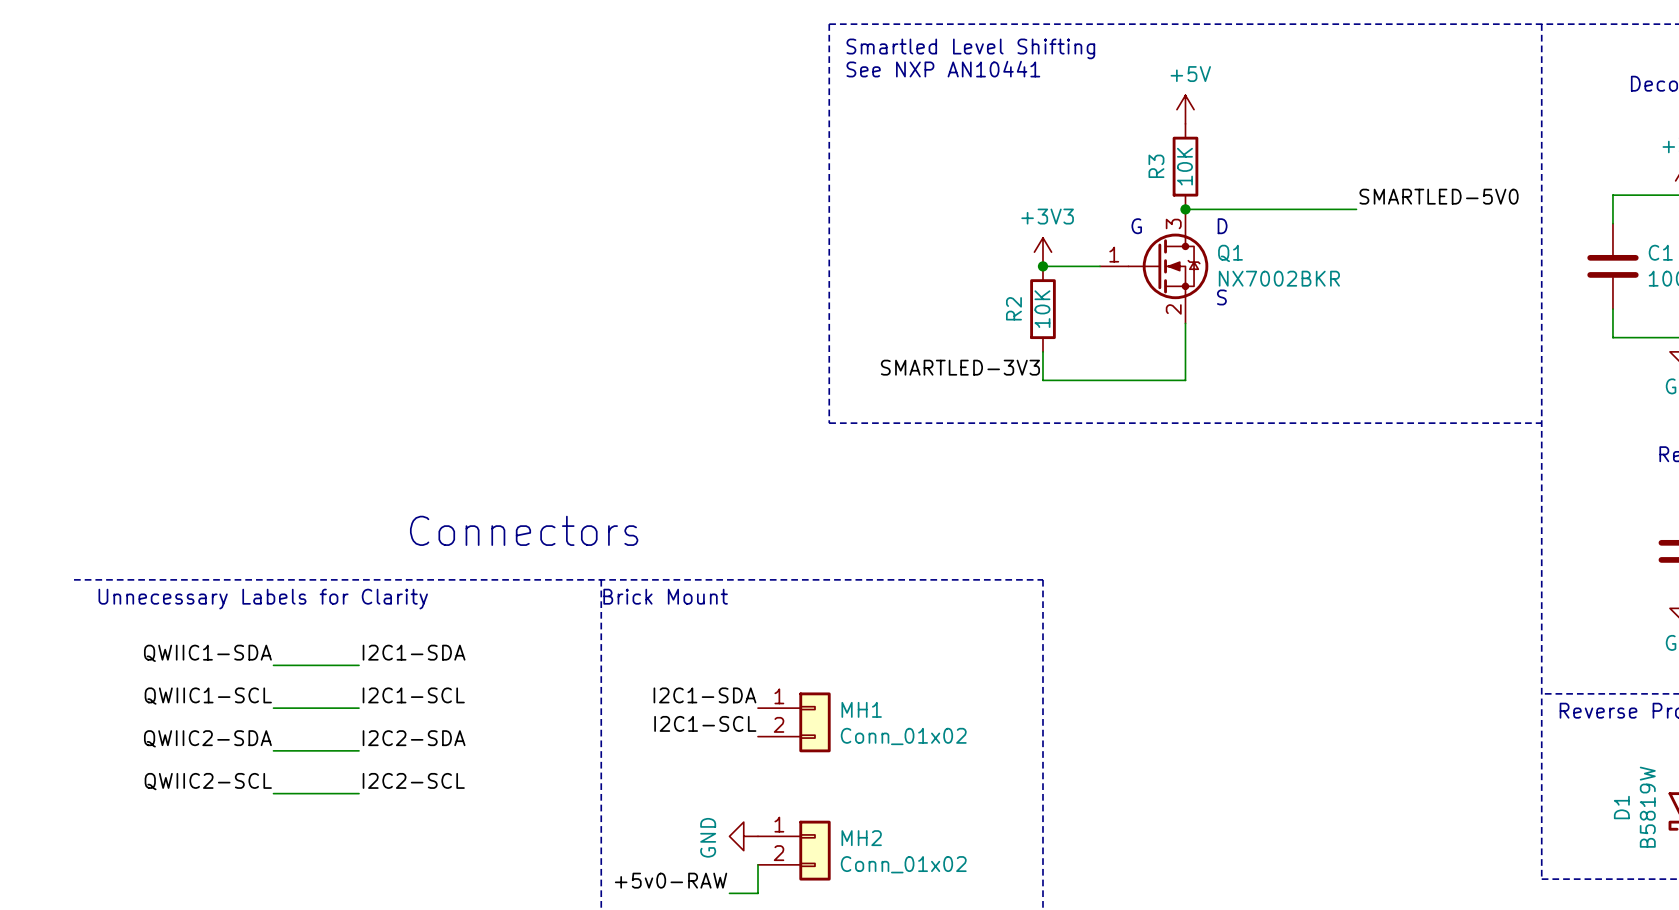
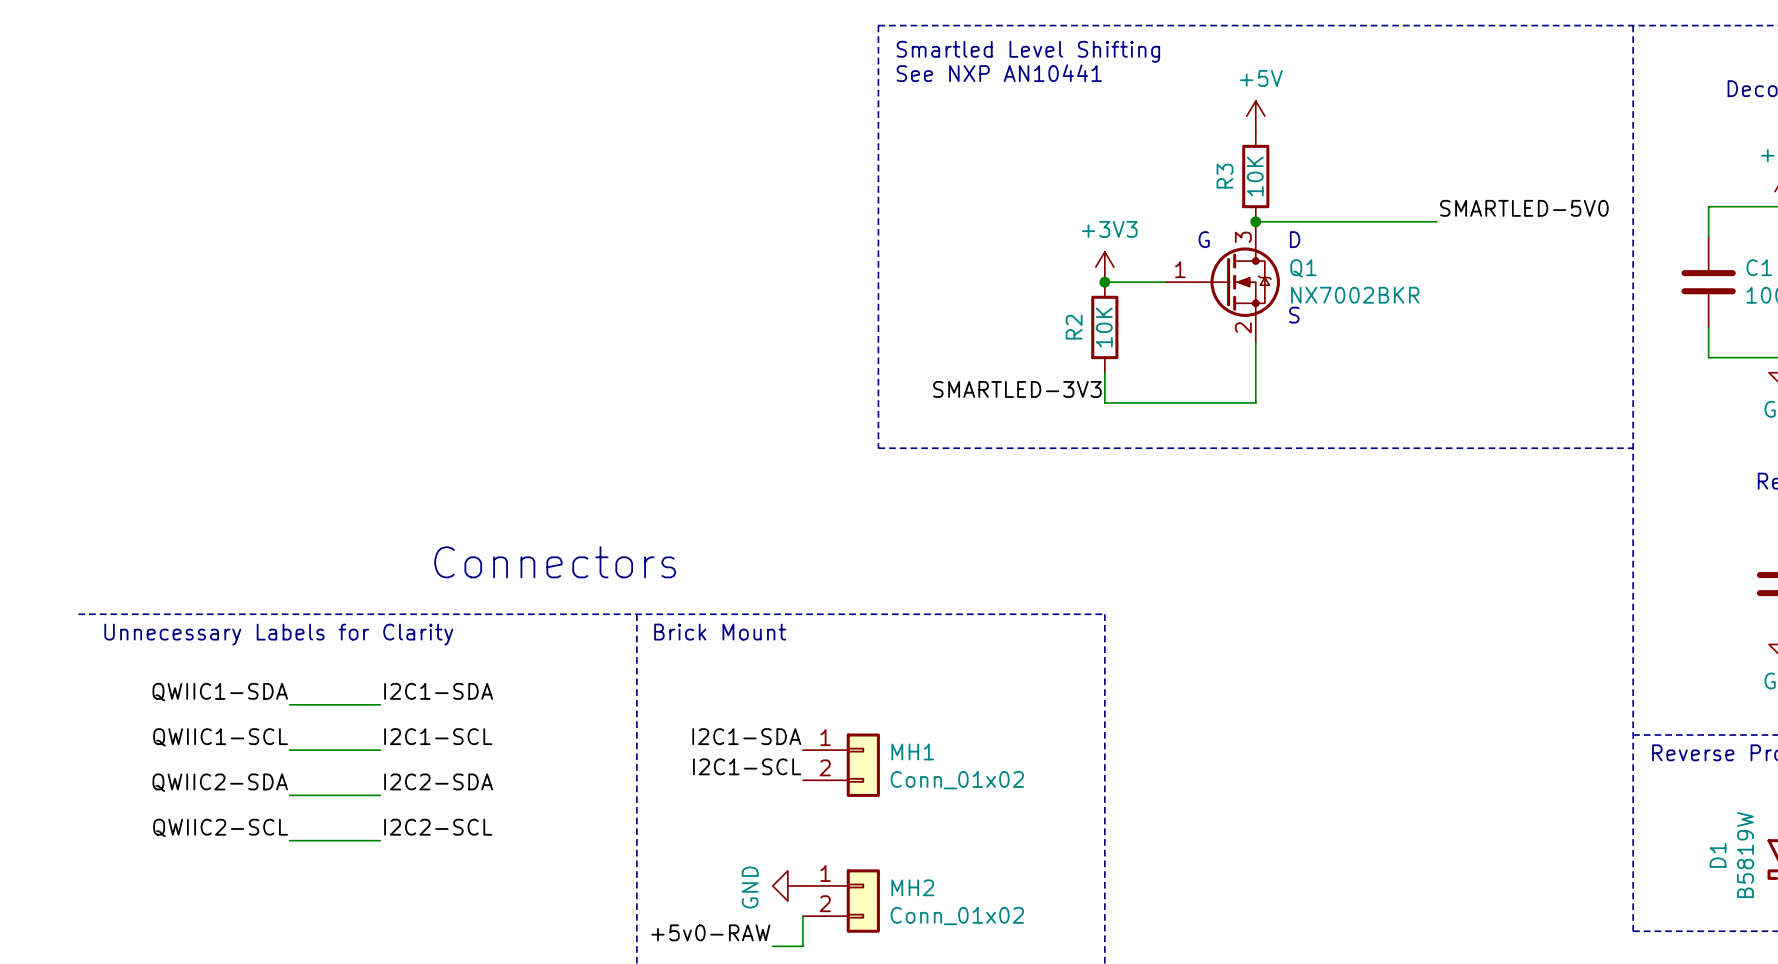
text position: Brick Mount (665, 596) -> Brick Mount (720, 632)

